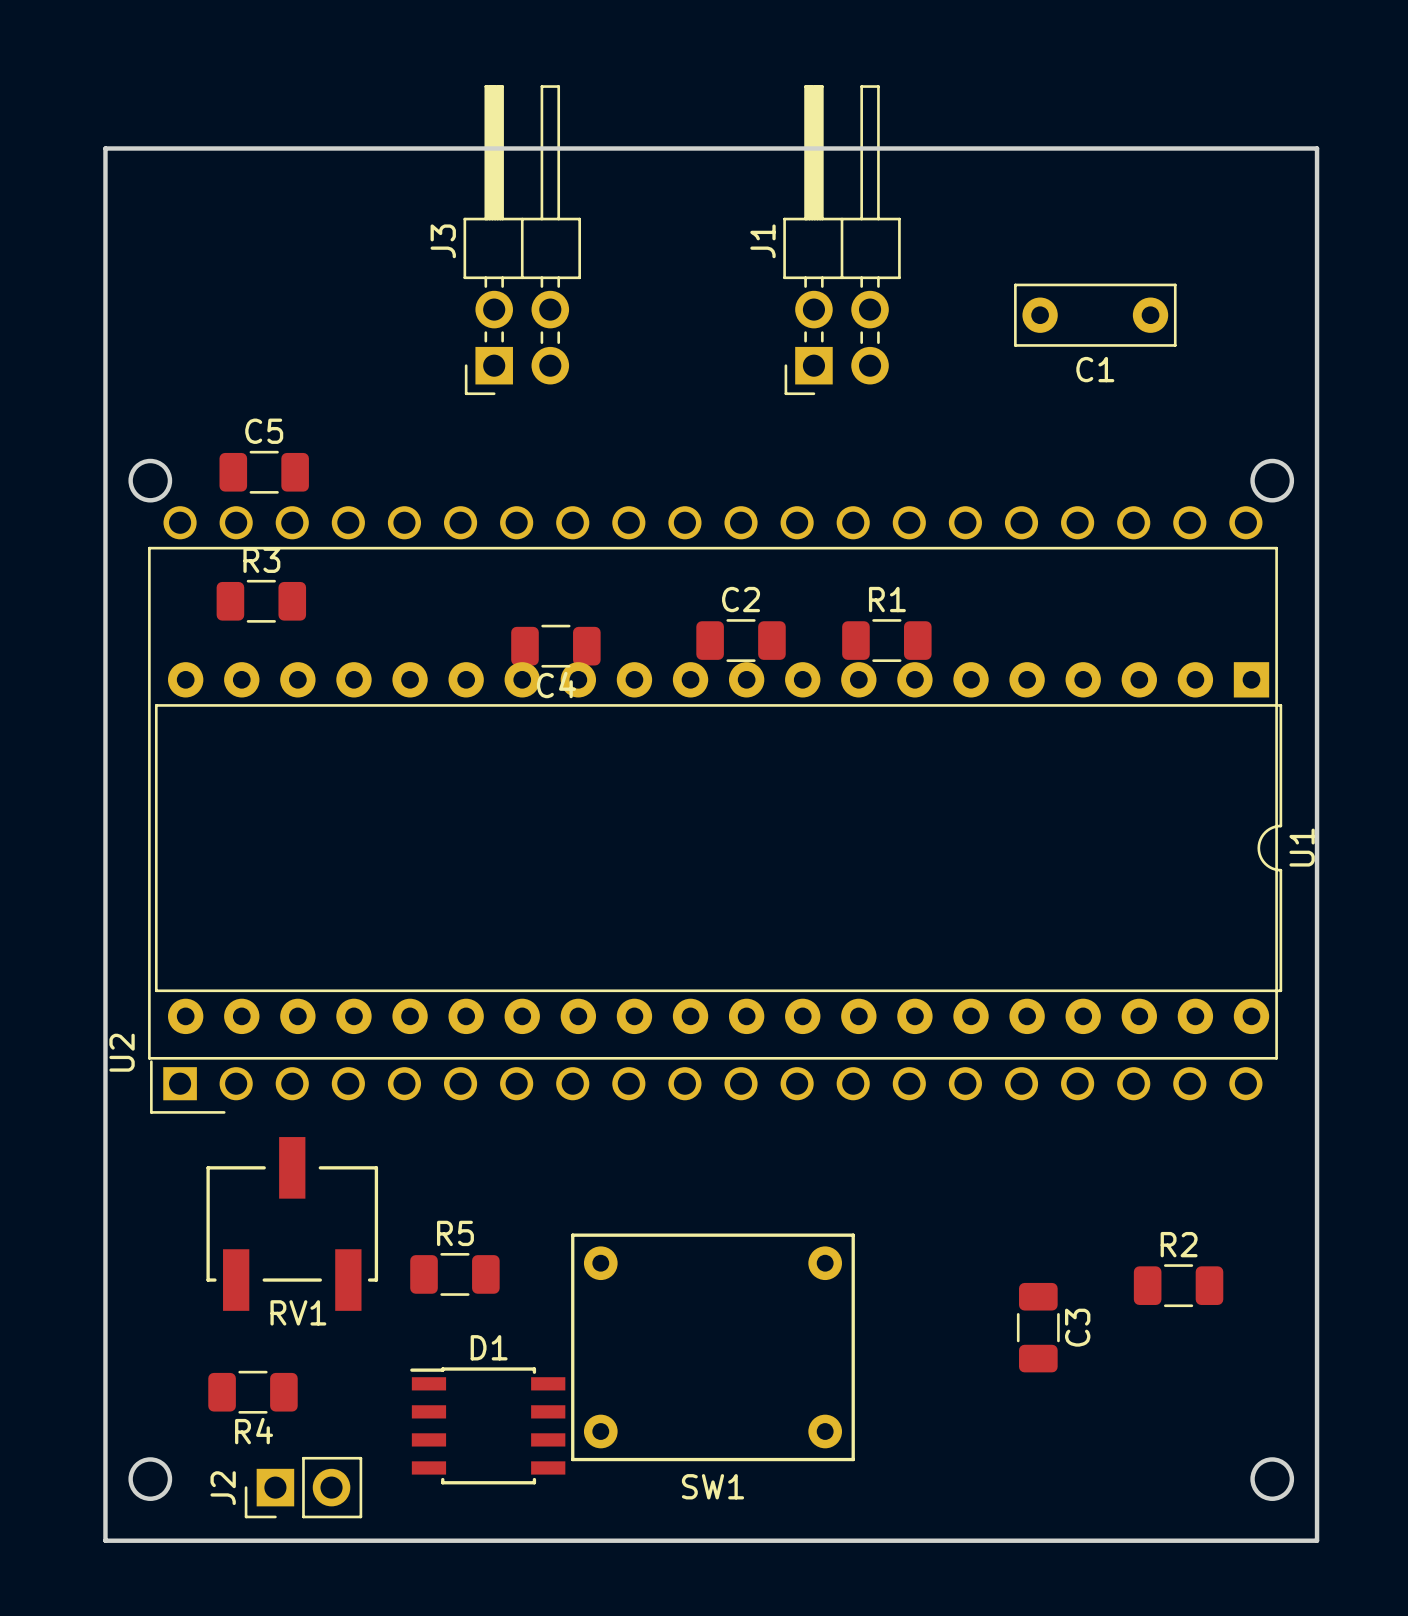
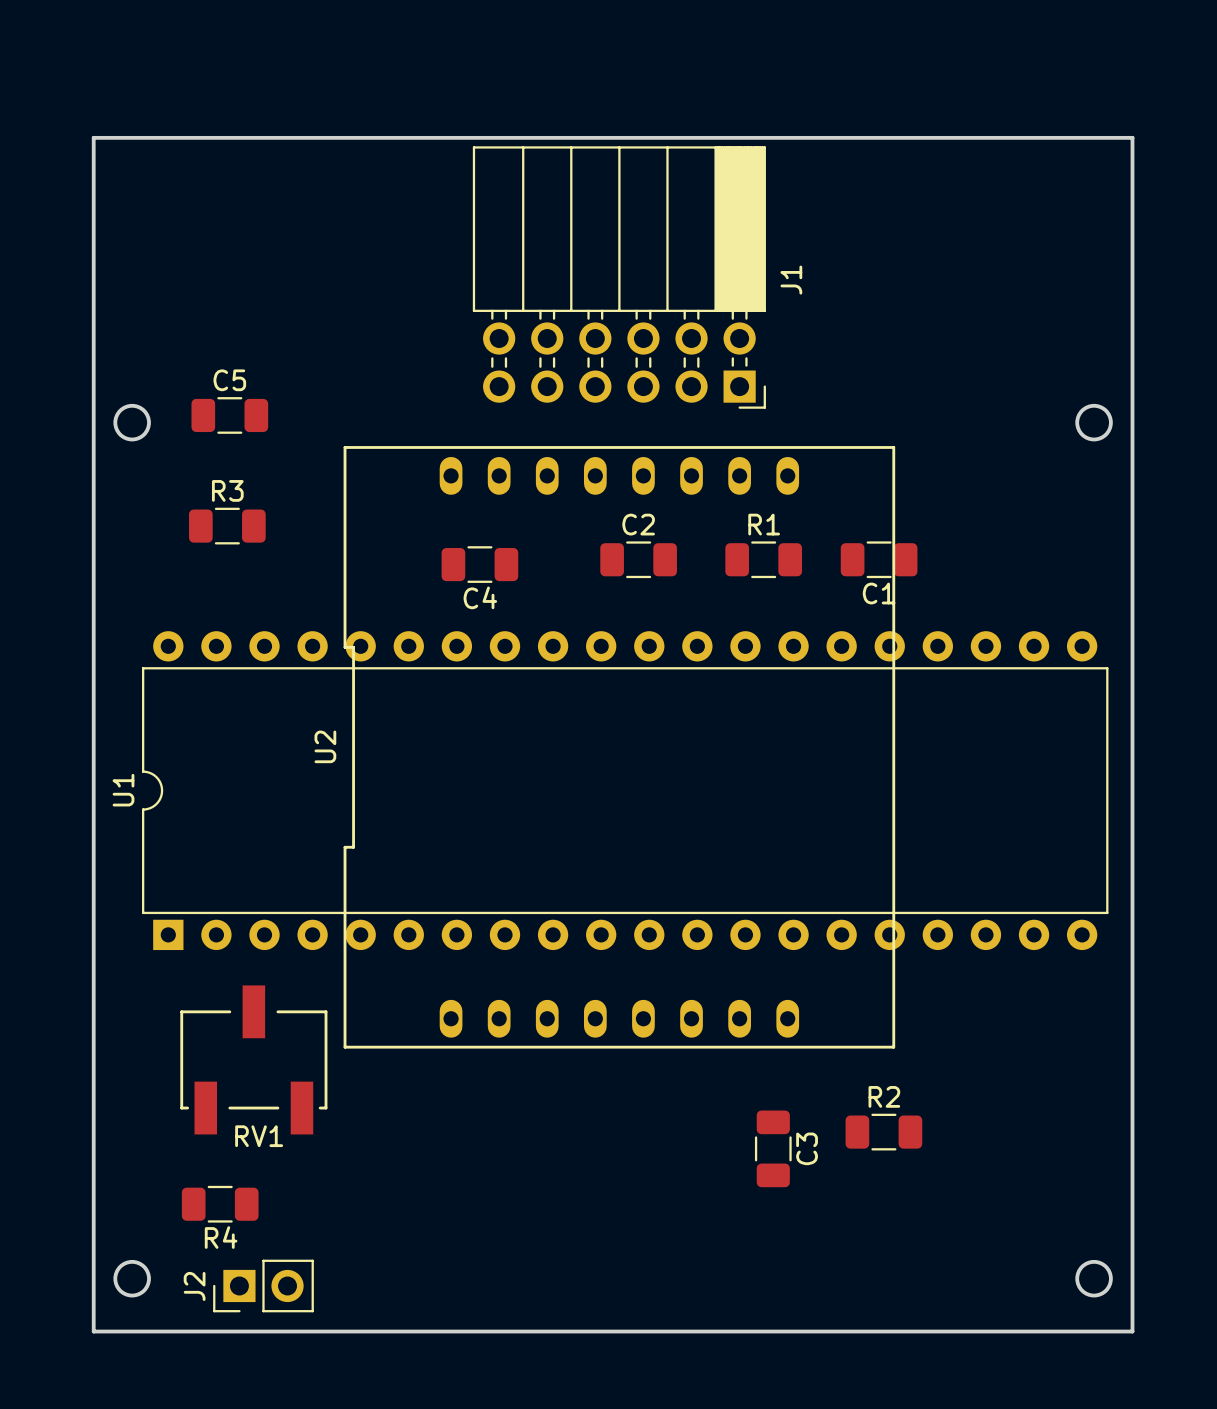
J1 footprint: [783, 85, 901, 396] -> [472, 146, 766, 409]
J3: (522, 240) -> none
J1 name position: J1 (762, 241) -> J1 (791, 280)
C1 footprint: [1014, 283, 1177, 347] -> [840, 541, 918, 579]
U2 footprint: [148, 506, 1278, 1114] -> [343, 446, 896, 1049]
U1 rotation: 0° (718, 848) -> 180° (625, 790)
U2 name position: U2 (122, 1052) -> U2 (325, 746)
R5: (454, 1274) -> none
R2 position: (1178, 1285) -> (883, 1132)
C3 position: (1038, 1327) -> (773, 1148)
SW1: (712, 1347) -> none
D1: (487, 1425) -> none

